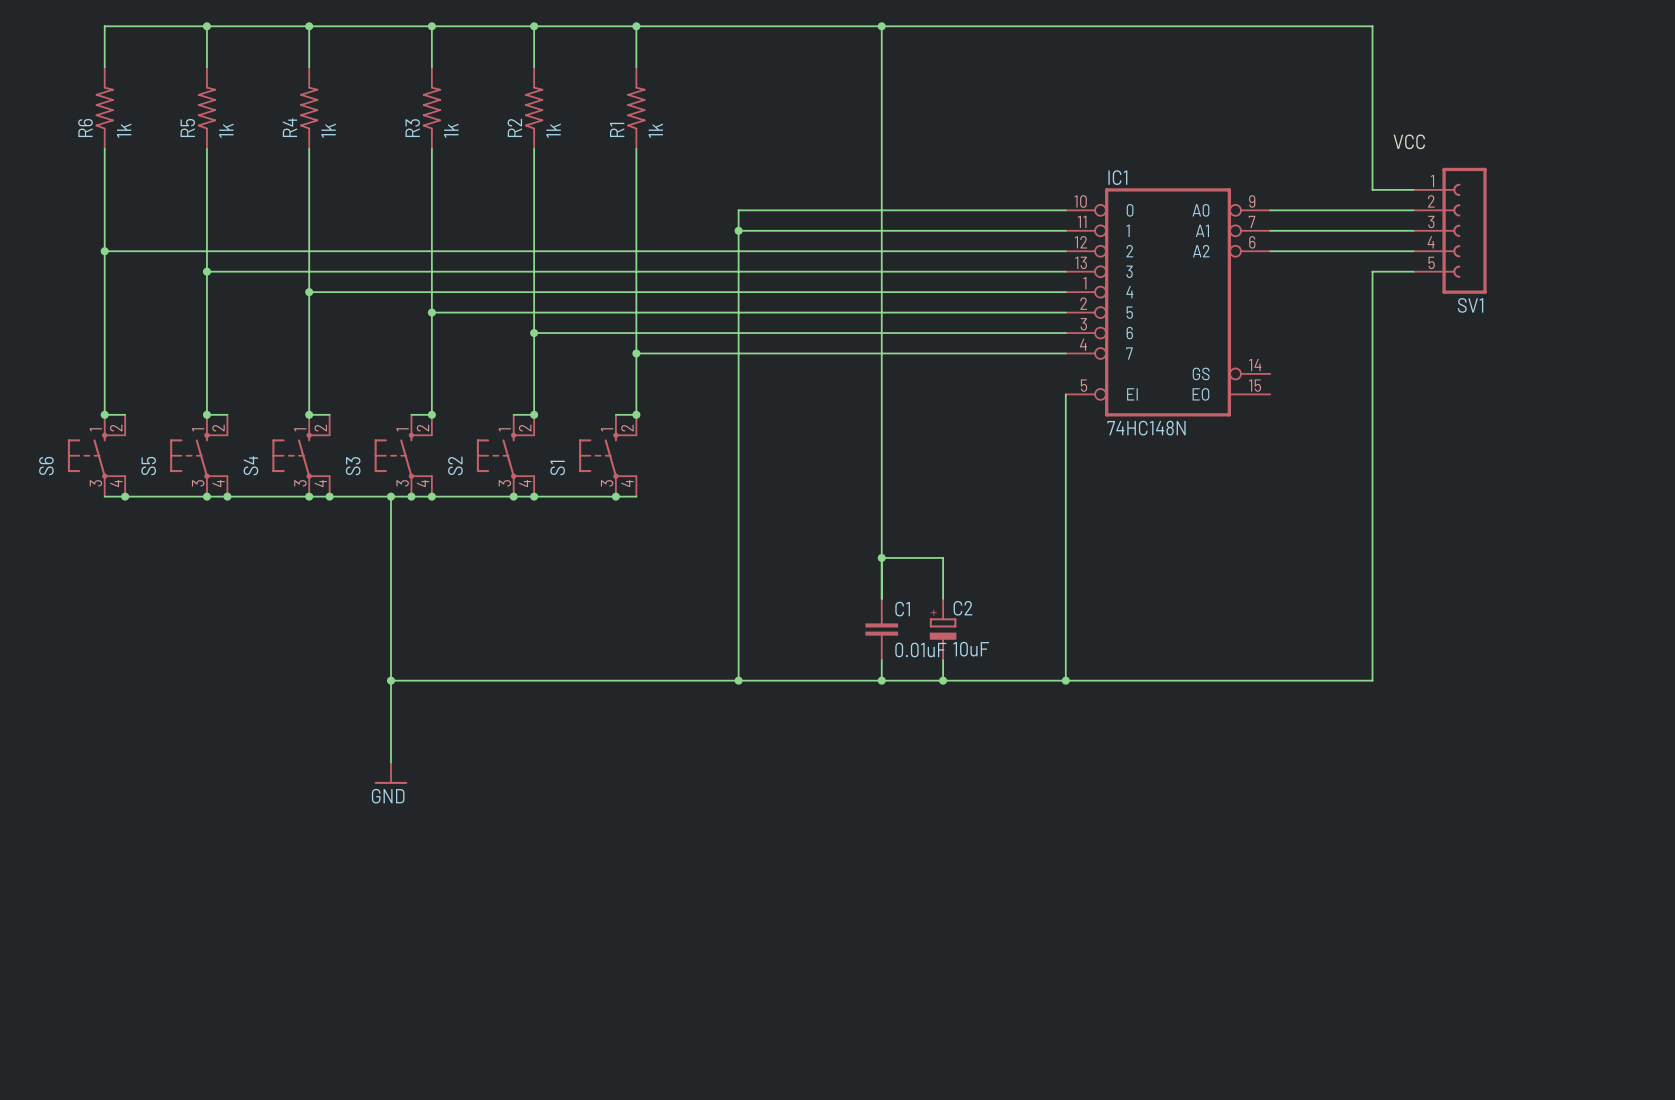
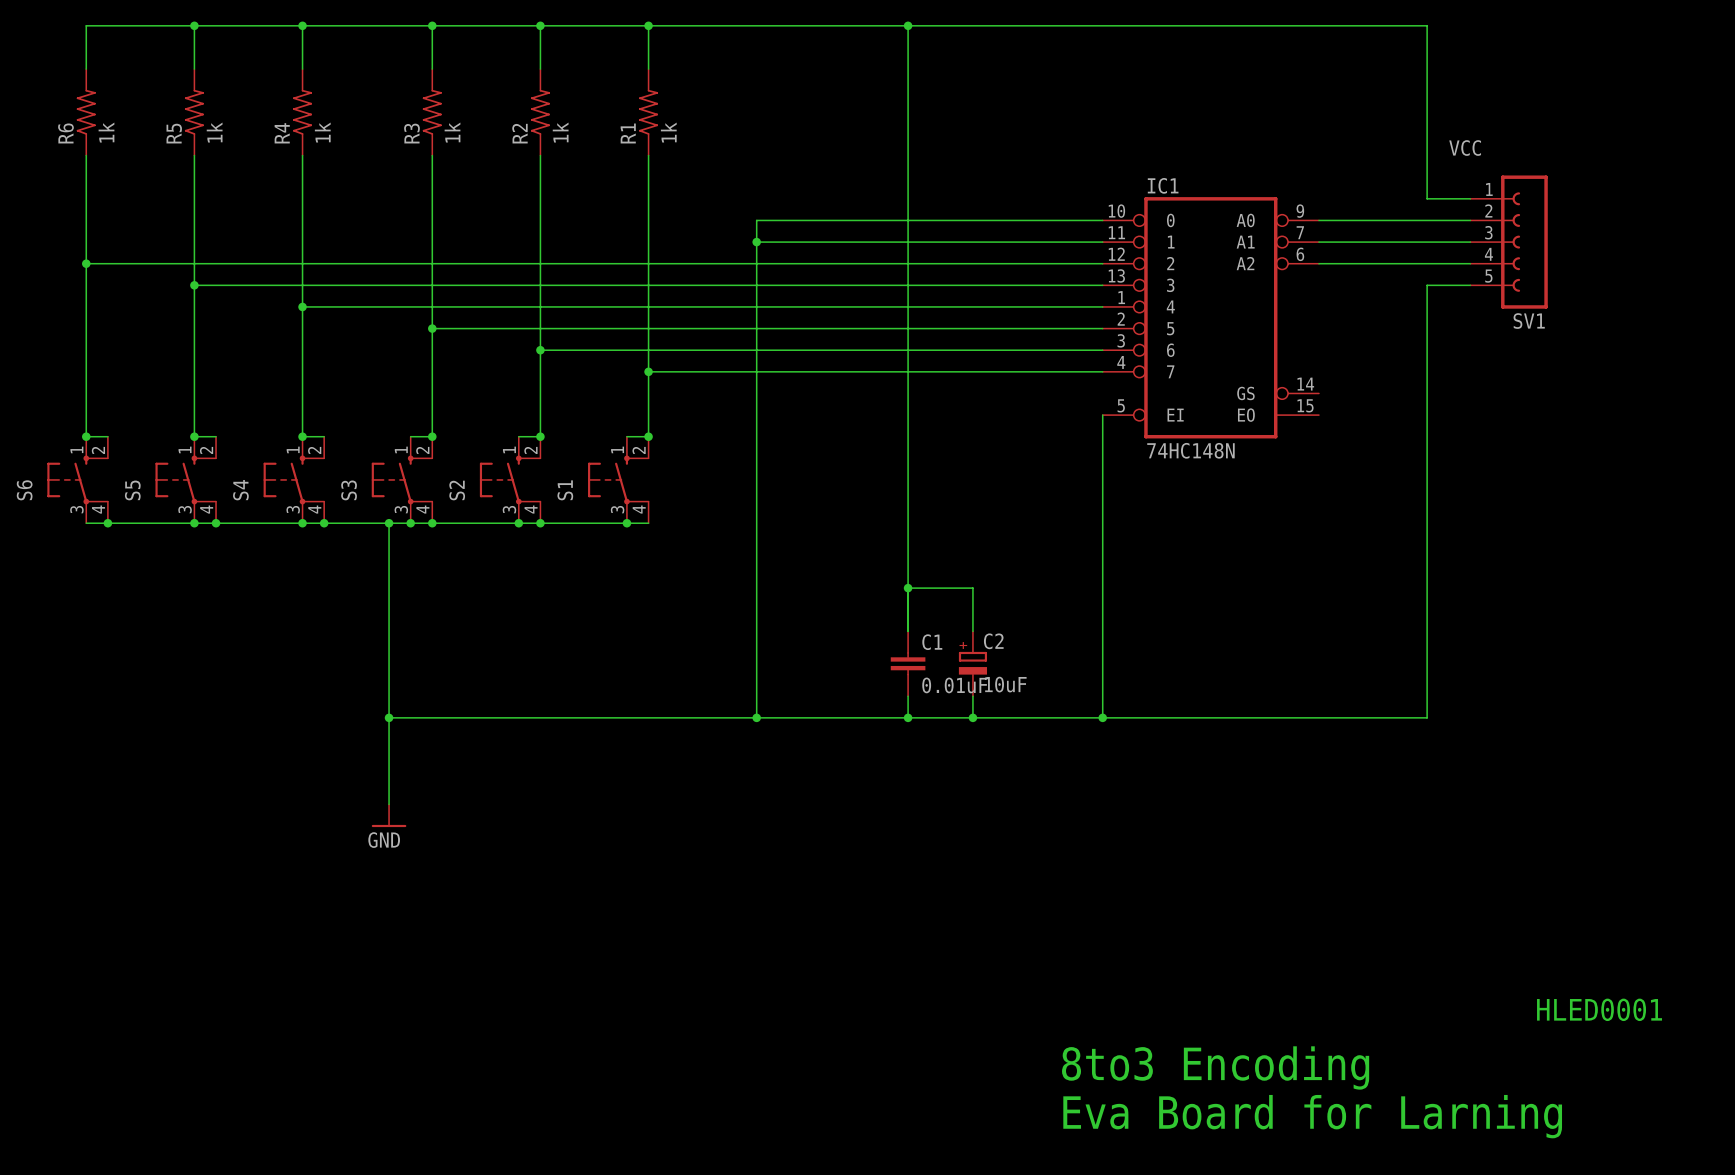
text: none -> HLED0001 (1599, 1009)
text: none -> 8to3 Encoding (1215, 1067)
text: none -> Eva Board for Larning (1312, 1116)

